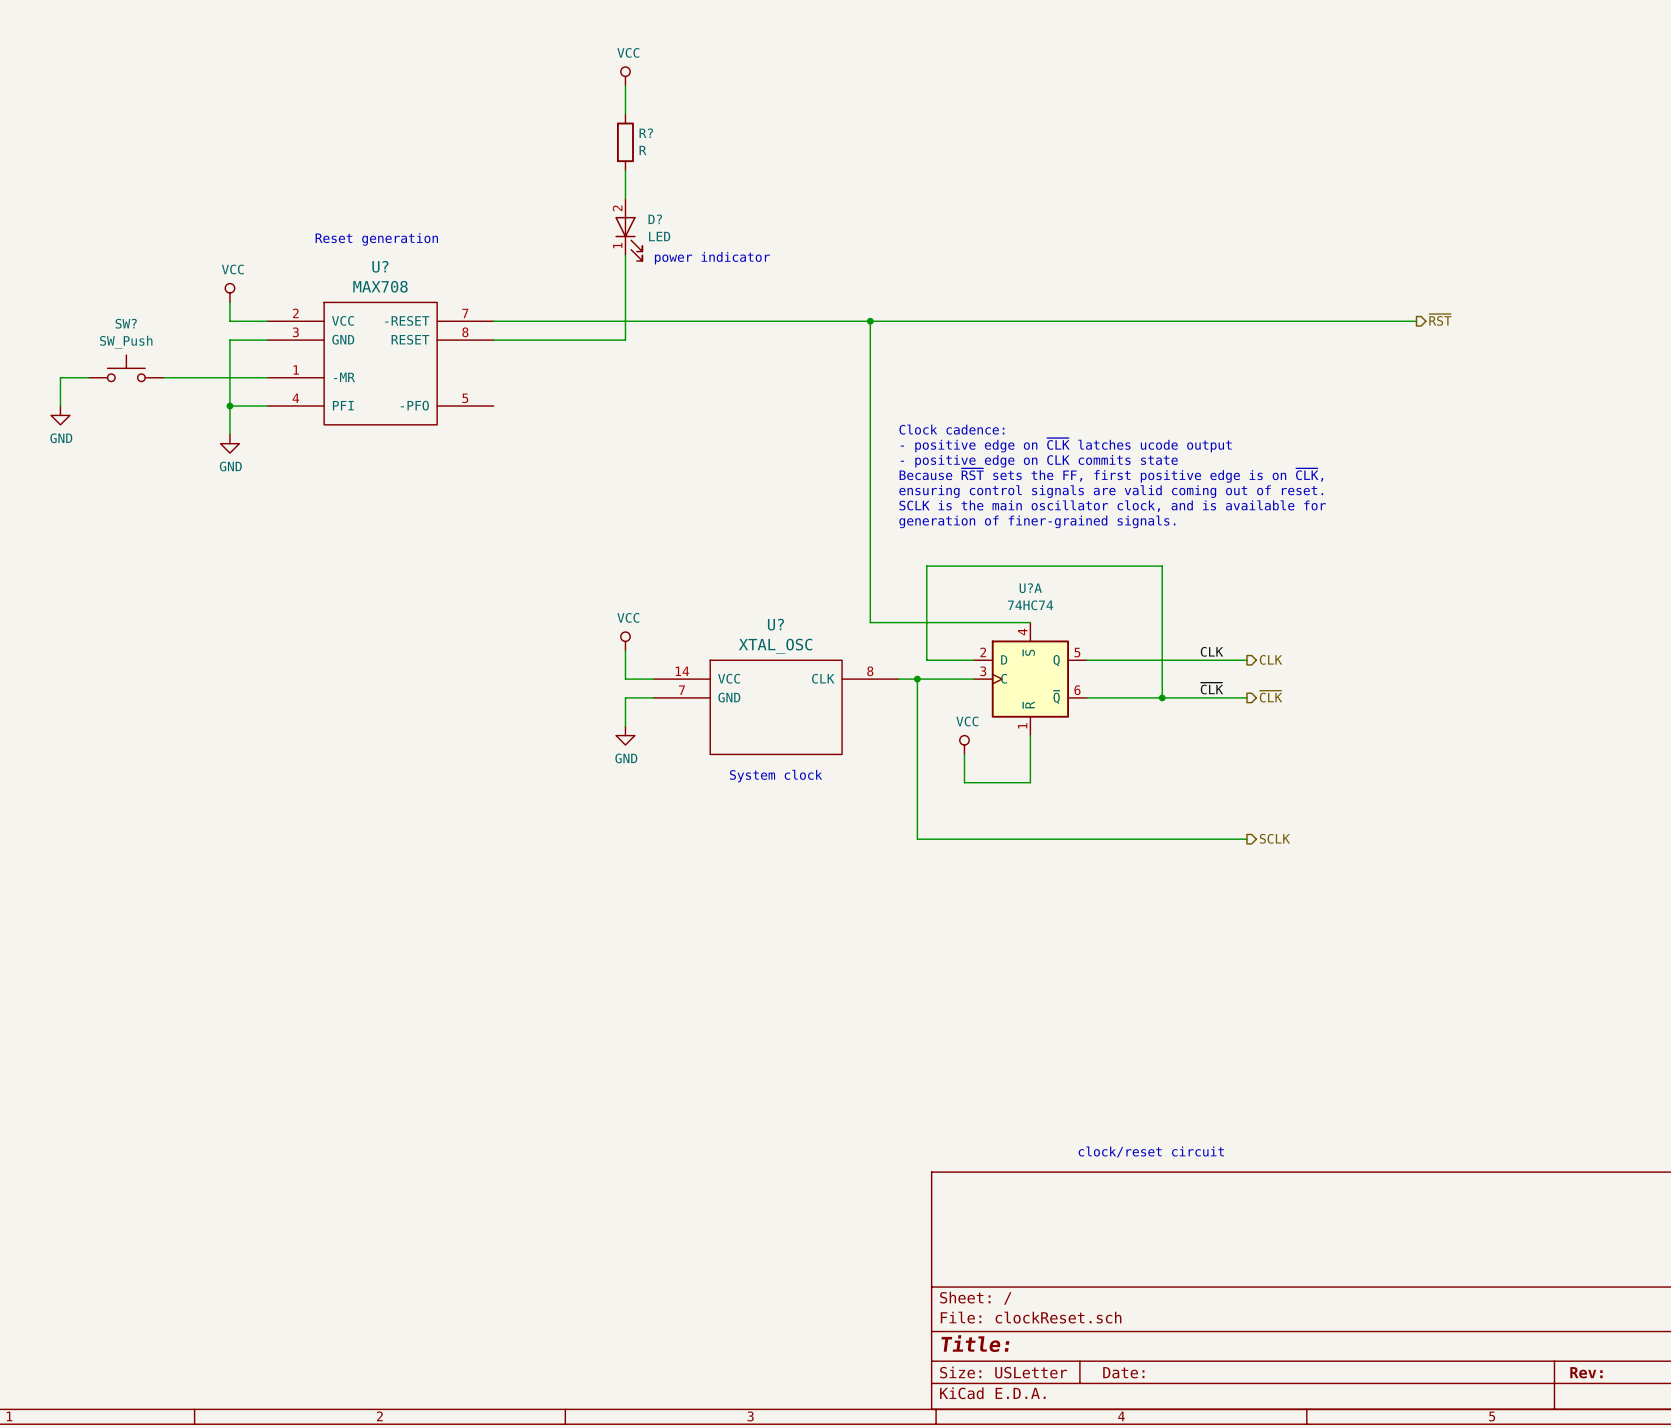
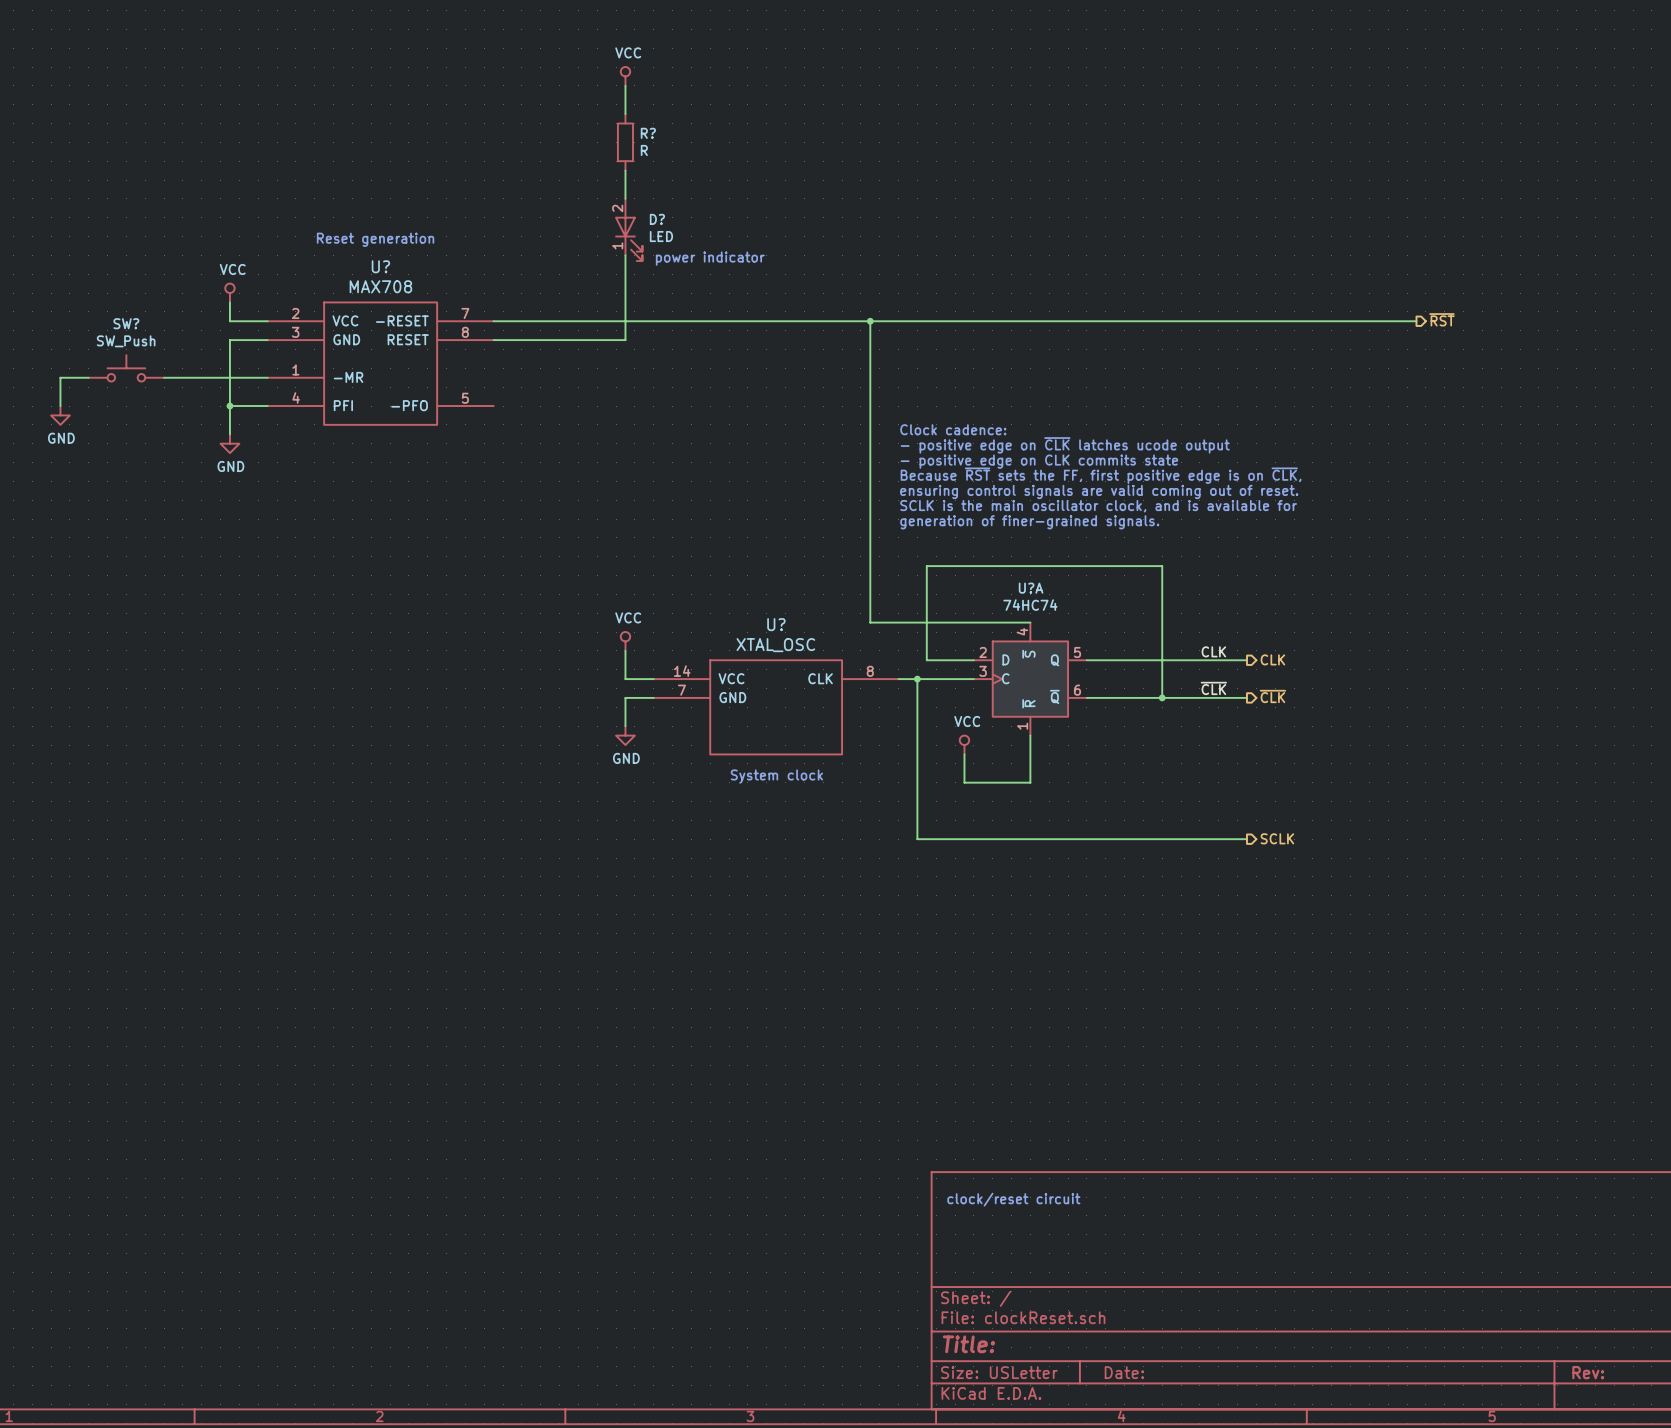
text position: clock/reset circuit (1151, 1152) -> clock/reset circuit (1013, 1199)

